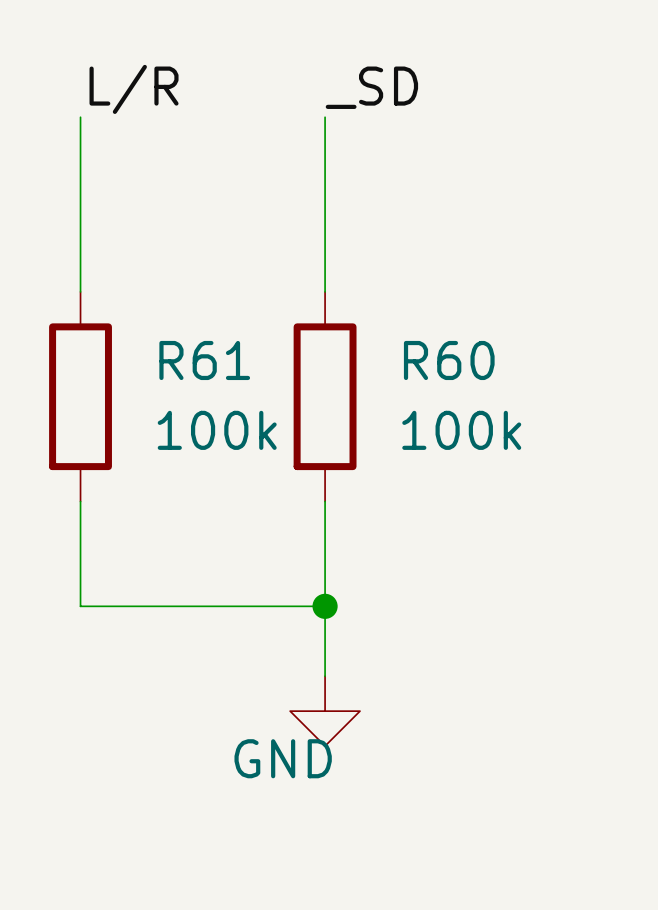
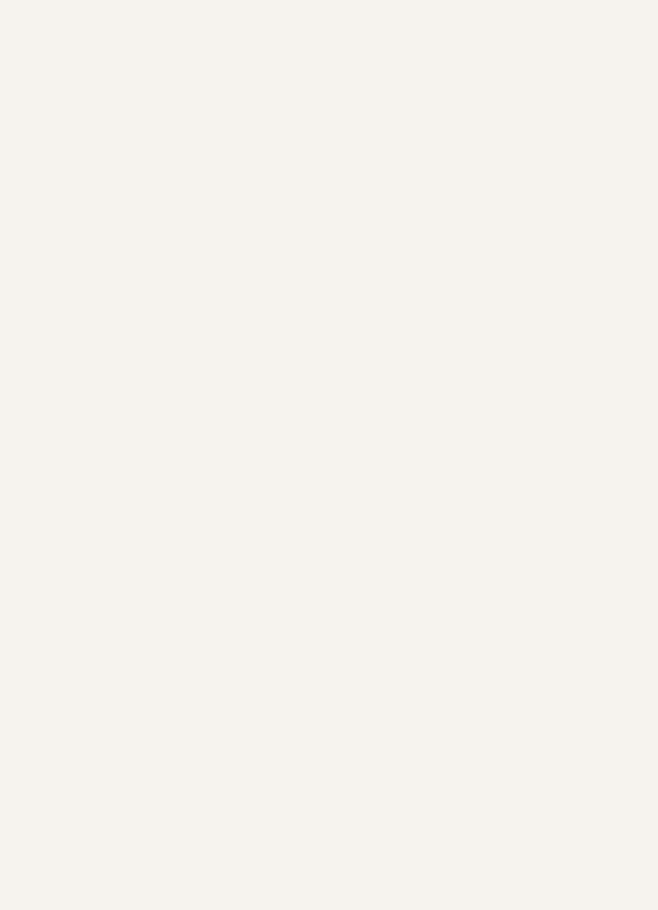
label: _SD (371, 87) -> none
label: L/R (134, 89) -> none
wire: (80, 117) (80, 291) -> none
wire: (325, 117) (325, 291) -> none
R61: 100k (80, 396) -> none
R60: 100k (325, 396) -> none
wire: (80, 501) (80, 606) (325, 606) -> none
wire: (325, 501) (325, 676) -> none
junction: (325, 606) -> none
power symbol: GND (325, 711) -> none

